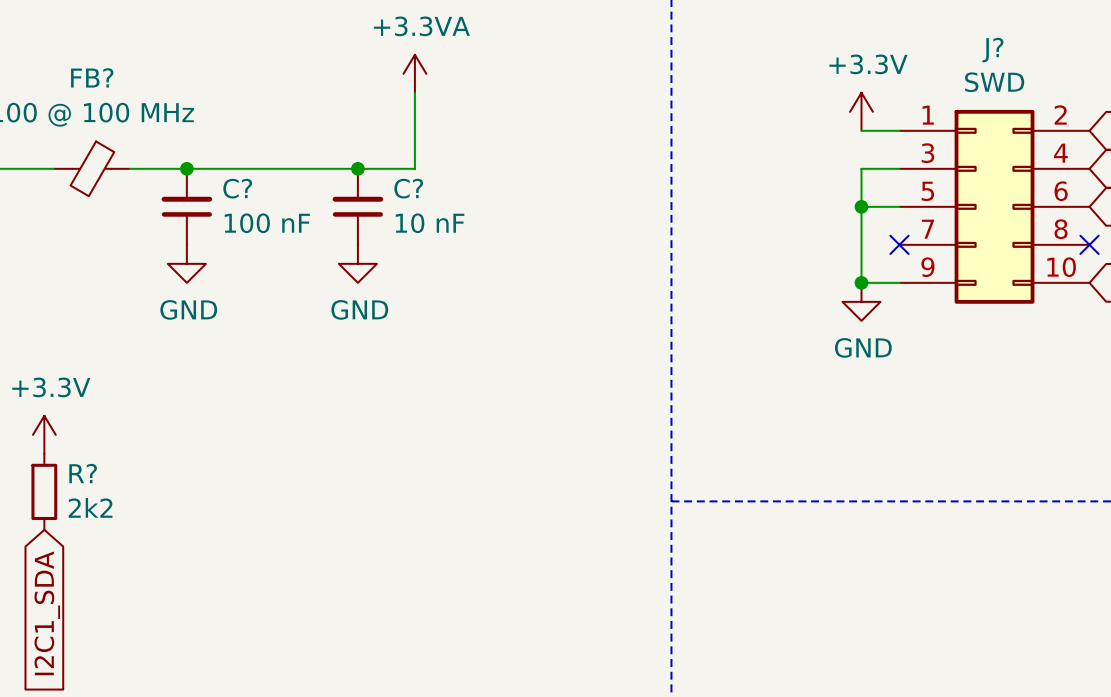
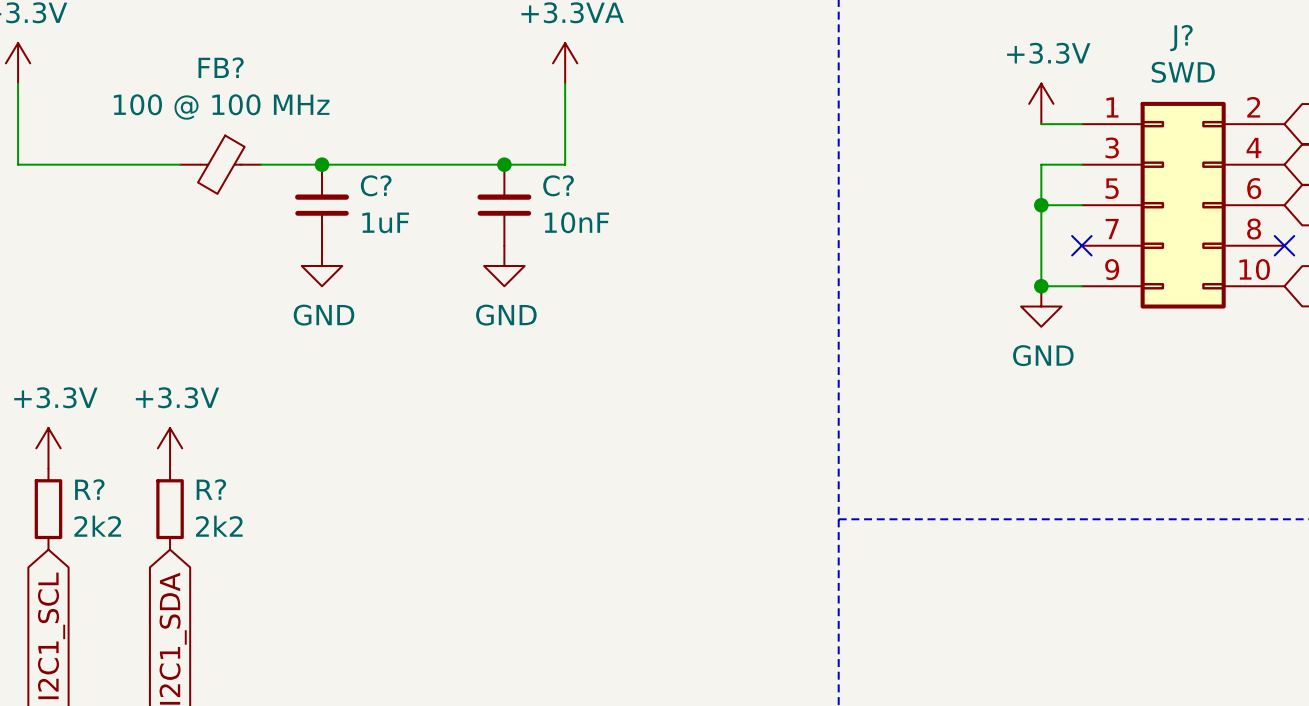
C? value: 100 nF (267, 223) -> 1uF (385, 222)
C? value: 10 nF (430, 223) -> 10nF (576, 222)

